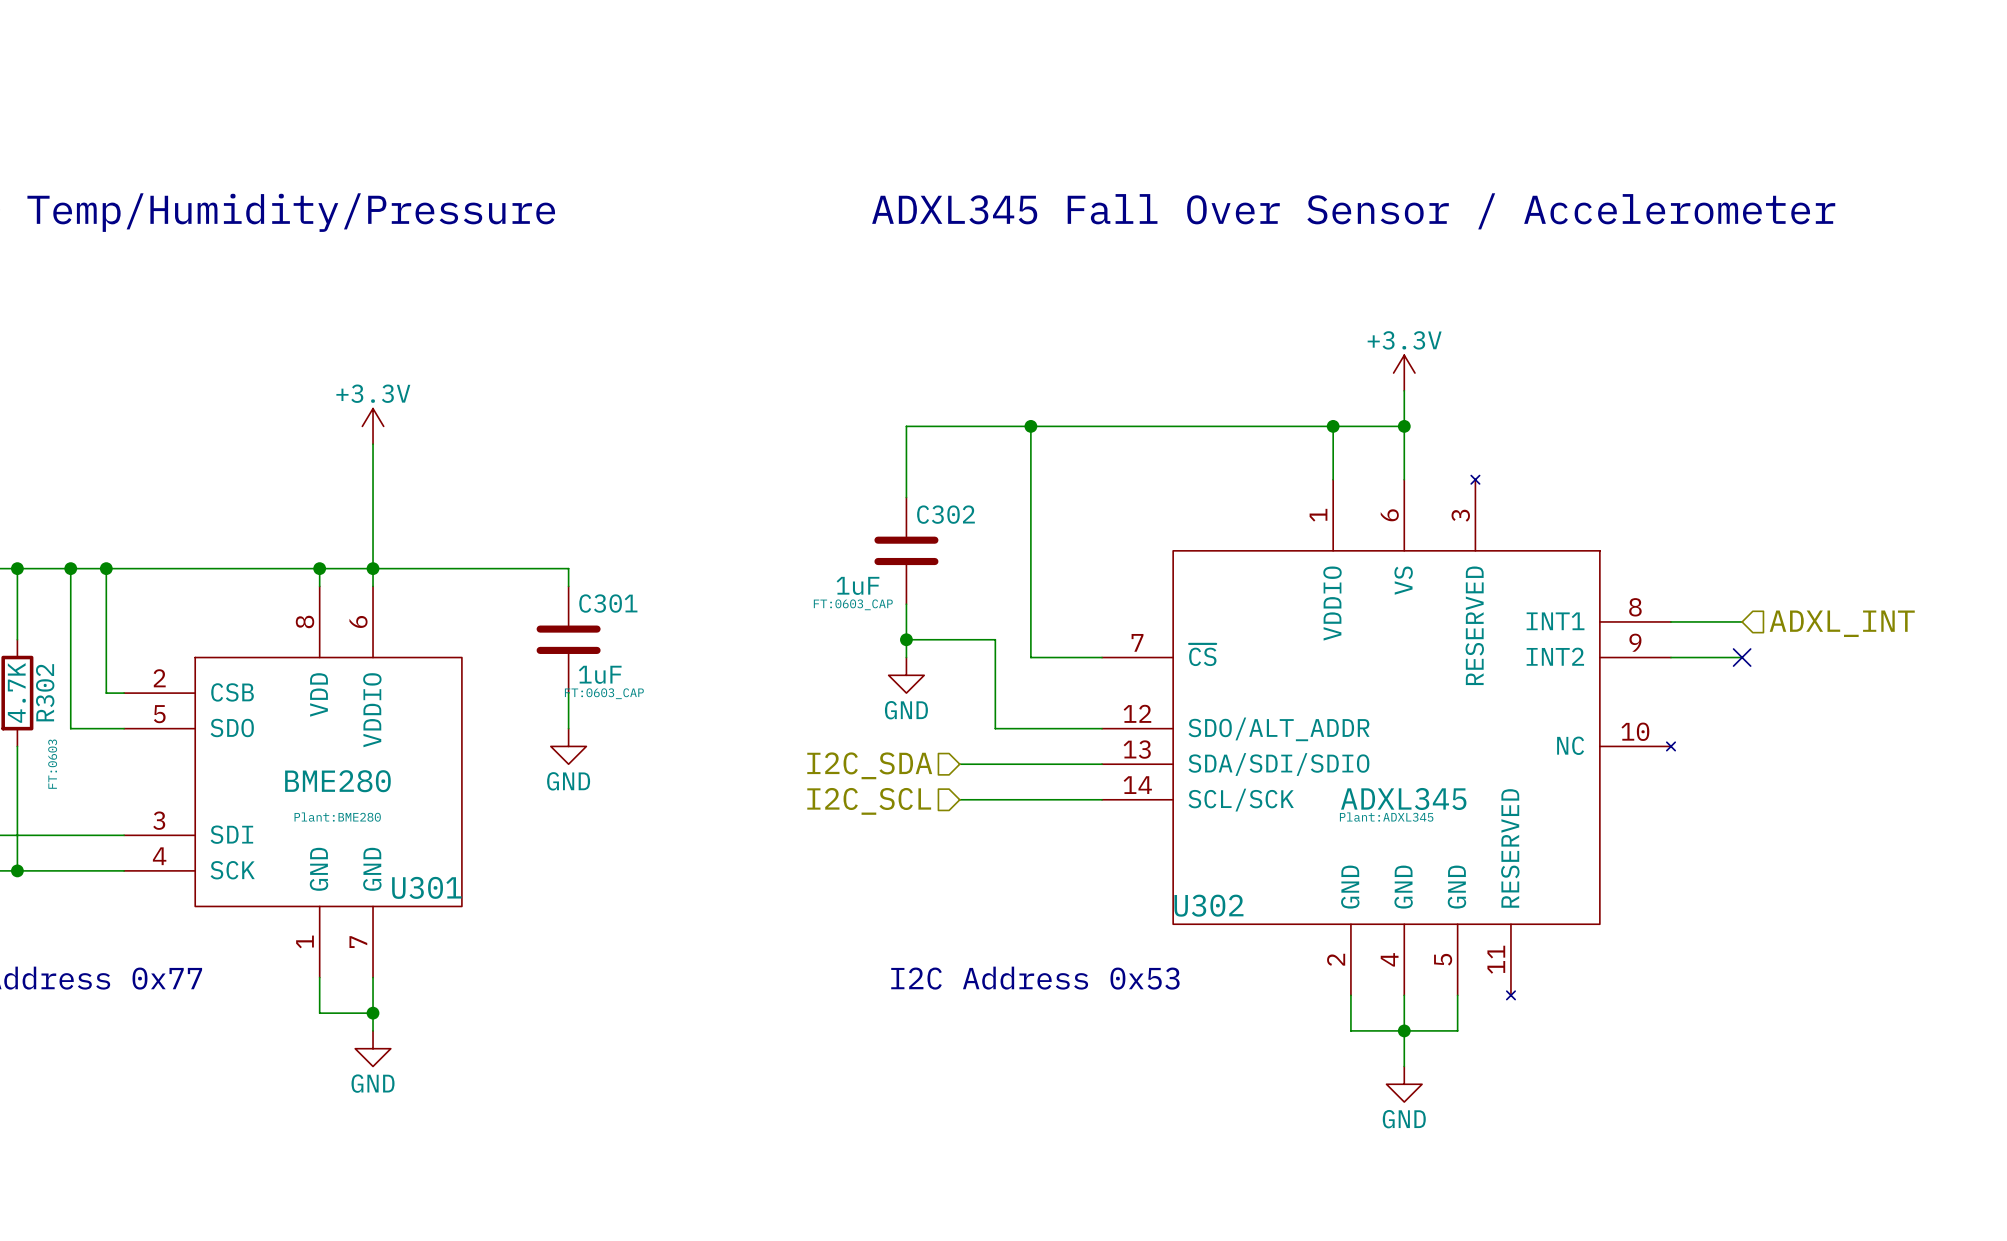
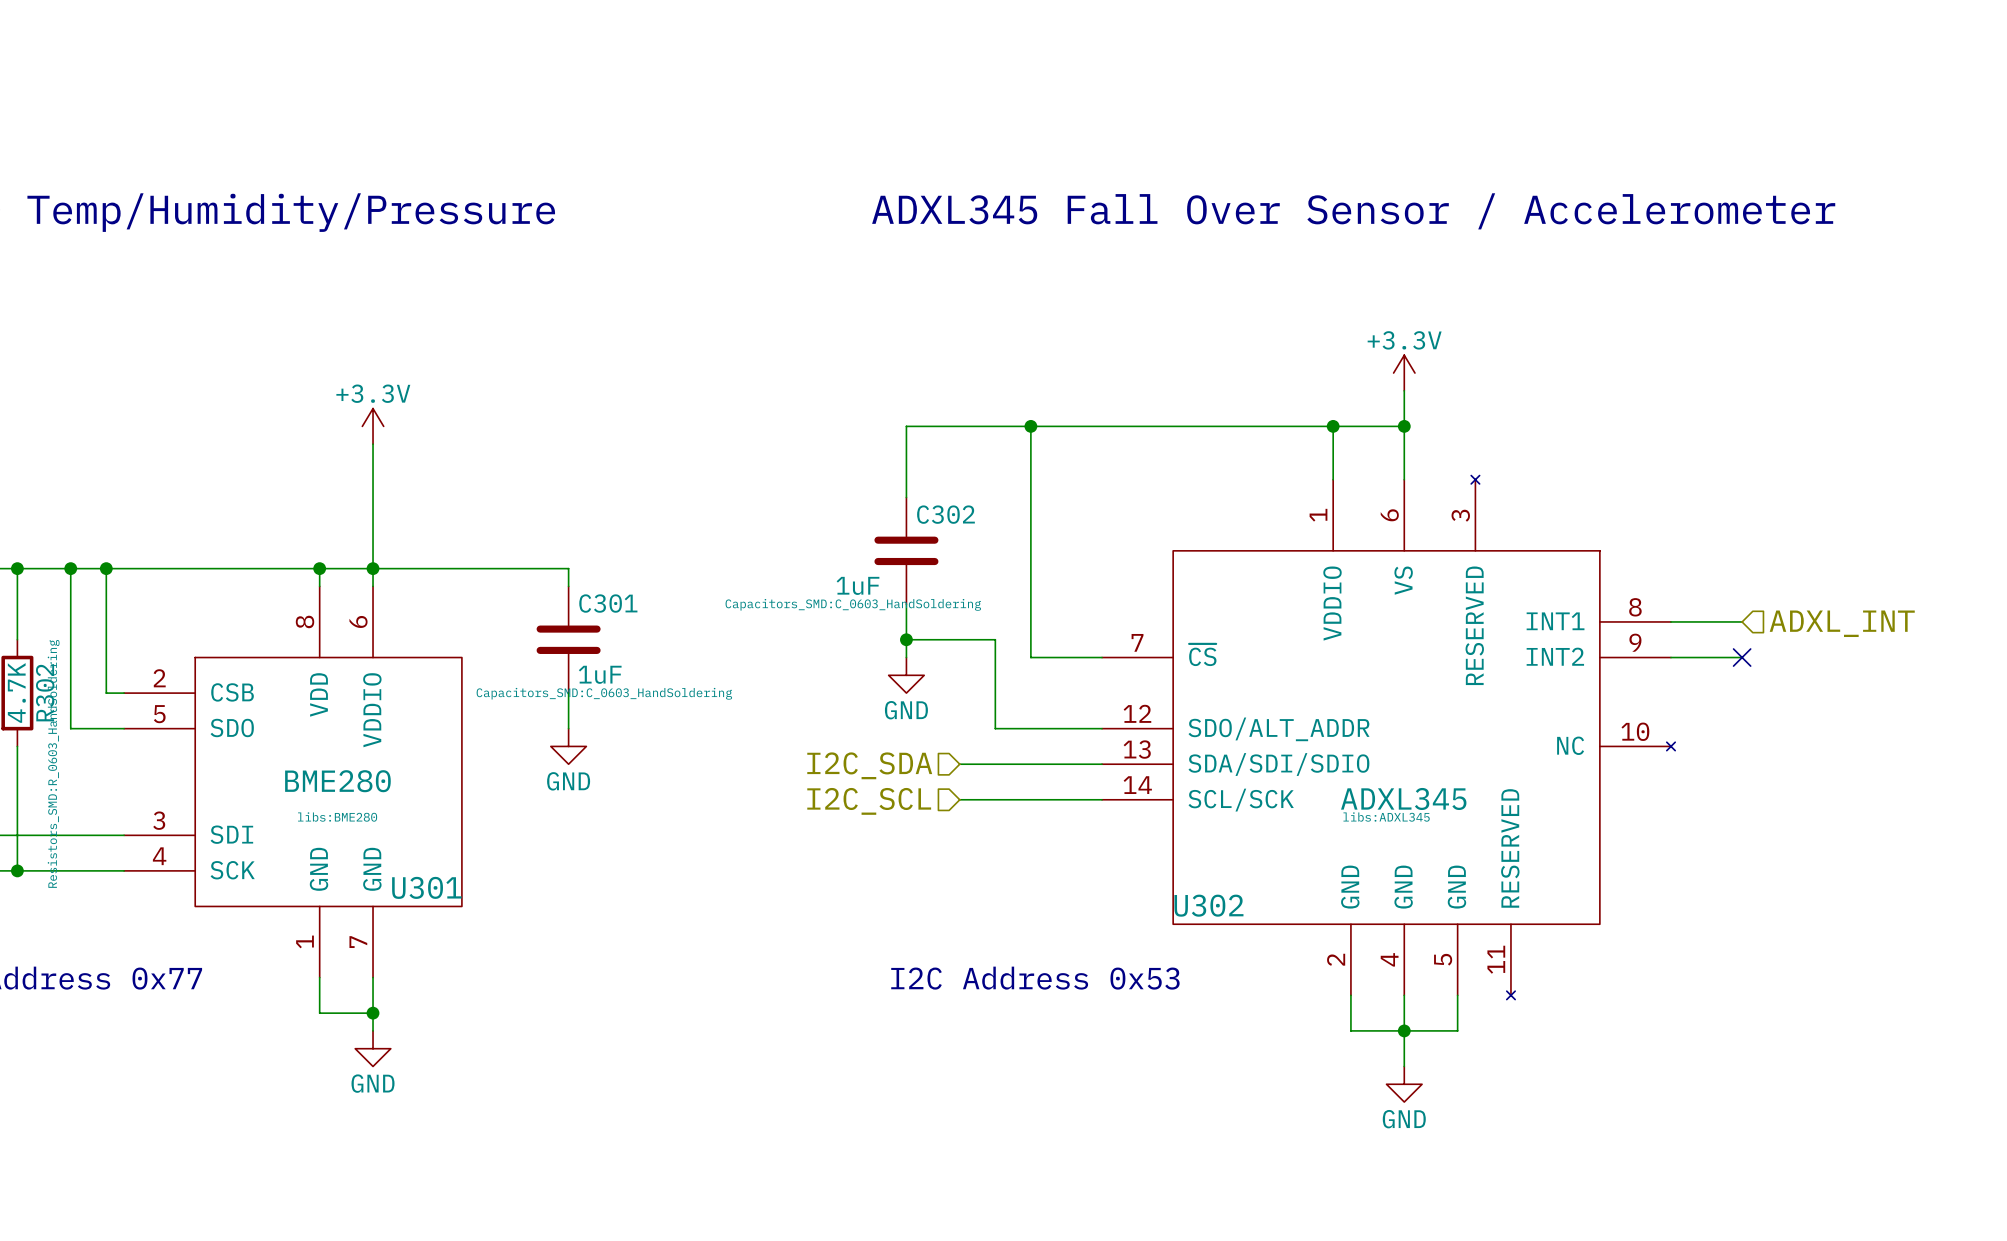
C302 text: FT:0603_CAP (853, 604) -> Capacitors_SMD:C_0603_HandSoldering (853, 604)
C301 text: FT:0603_CAP (604, 693) -> Capacitors_SMD:C_0603_HandSoldering (604, 693)
R302 text: FT:0603 (52, 764) -> Resistors_SMD:R_0603_HandSoldering (53, 763)
U301 text: Plant:BME280 (337, 817) -> libs:BME280 (337, 817)
U302 text: Plant:ADXL345 (1386, 817) -> libs:ADXL345 (1386, 817)

